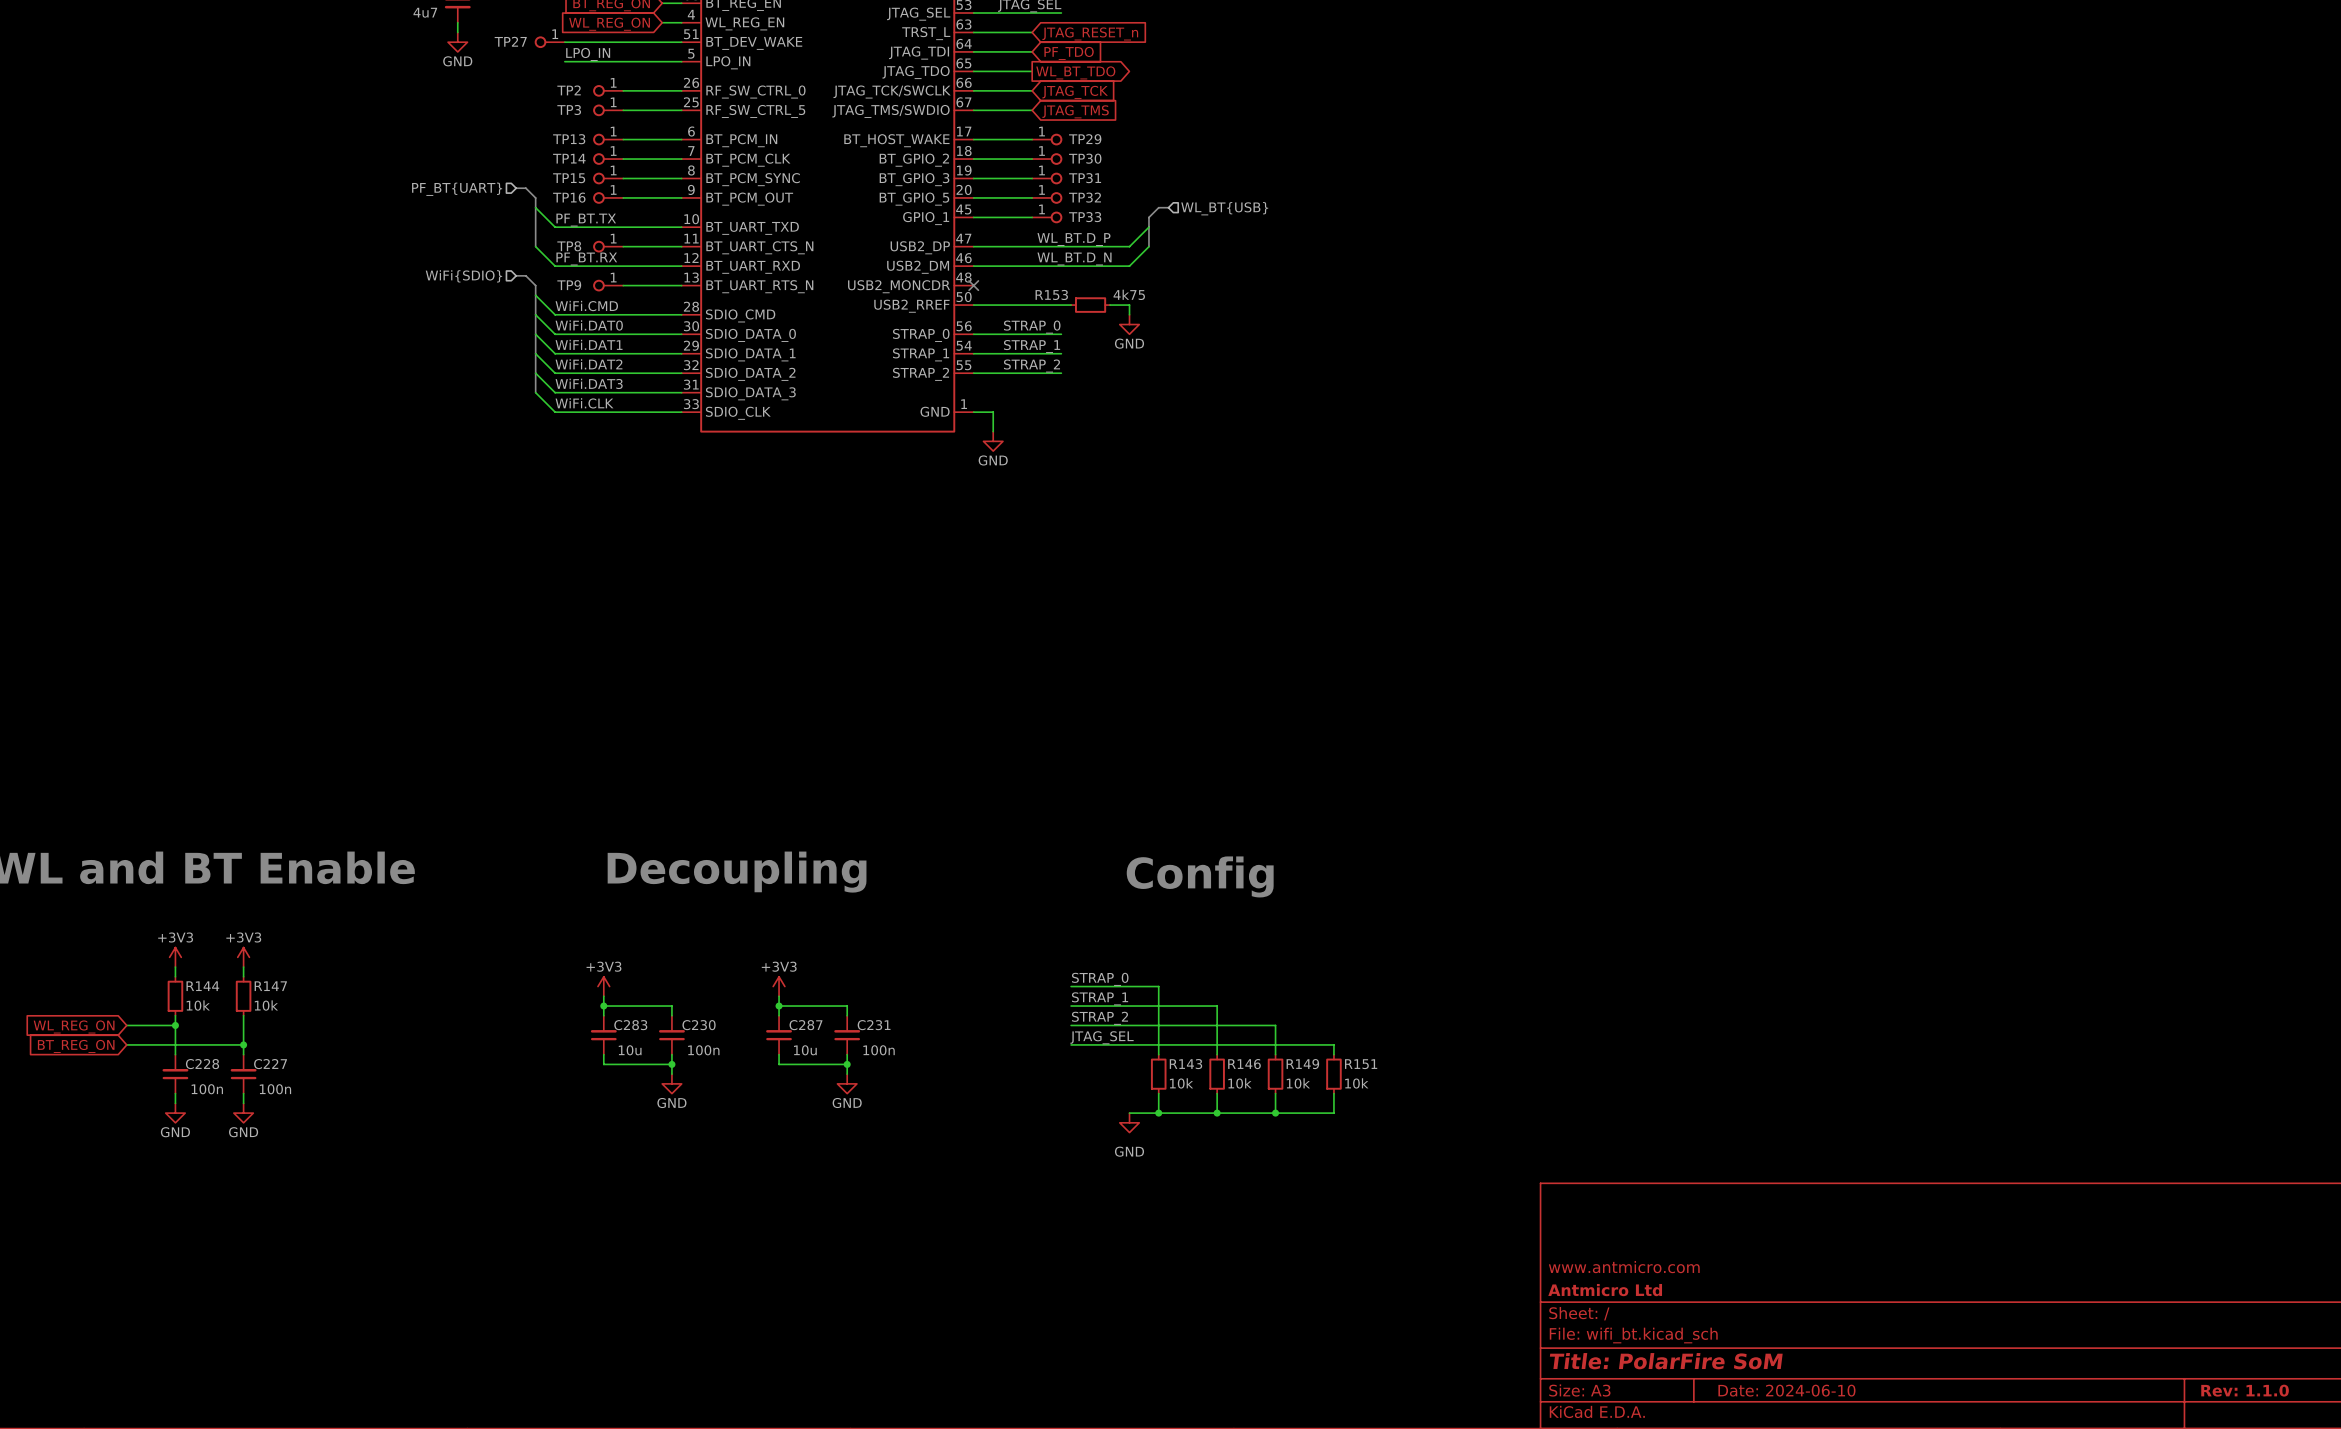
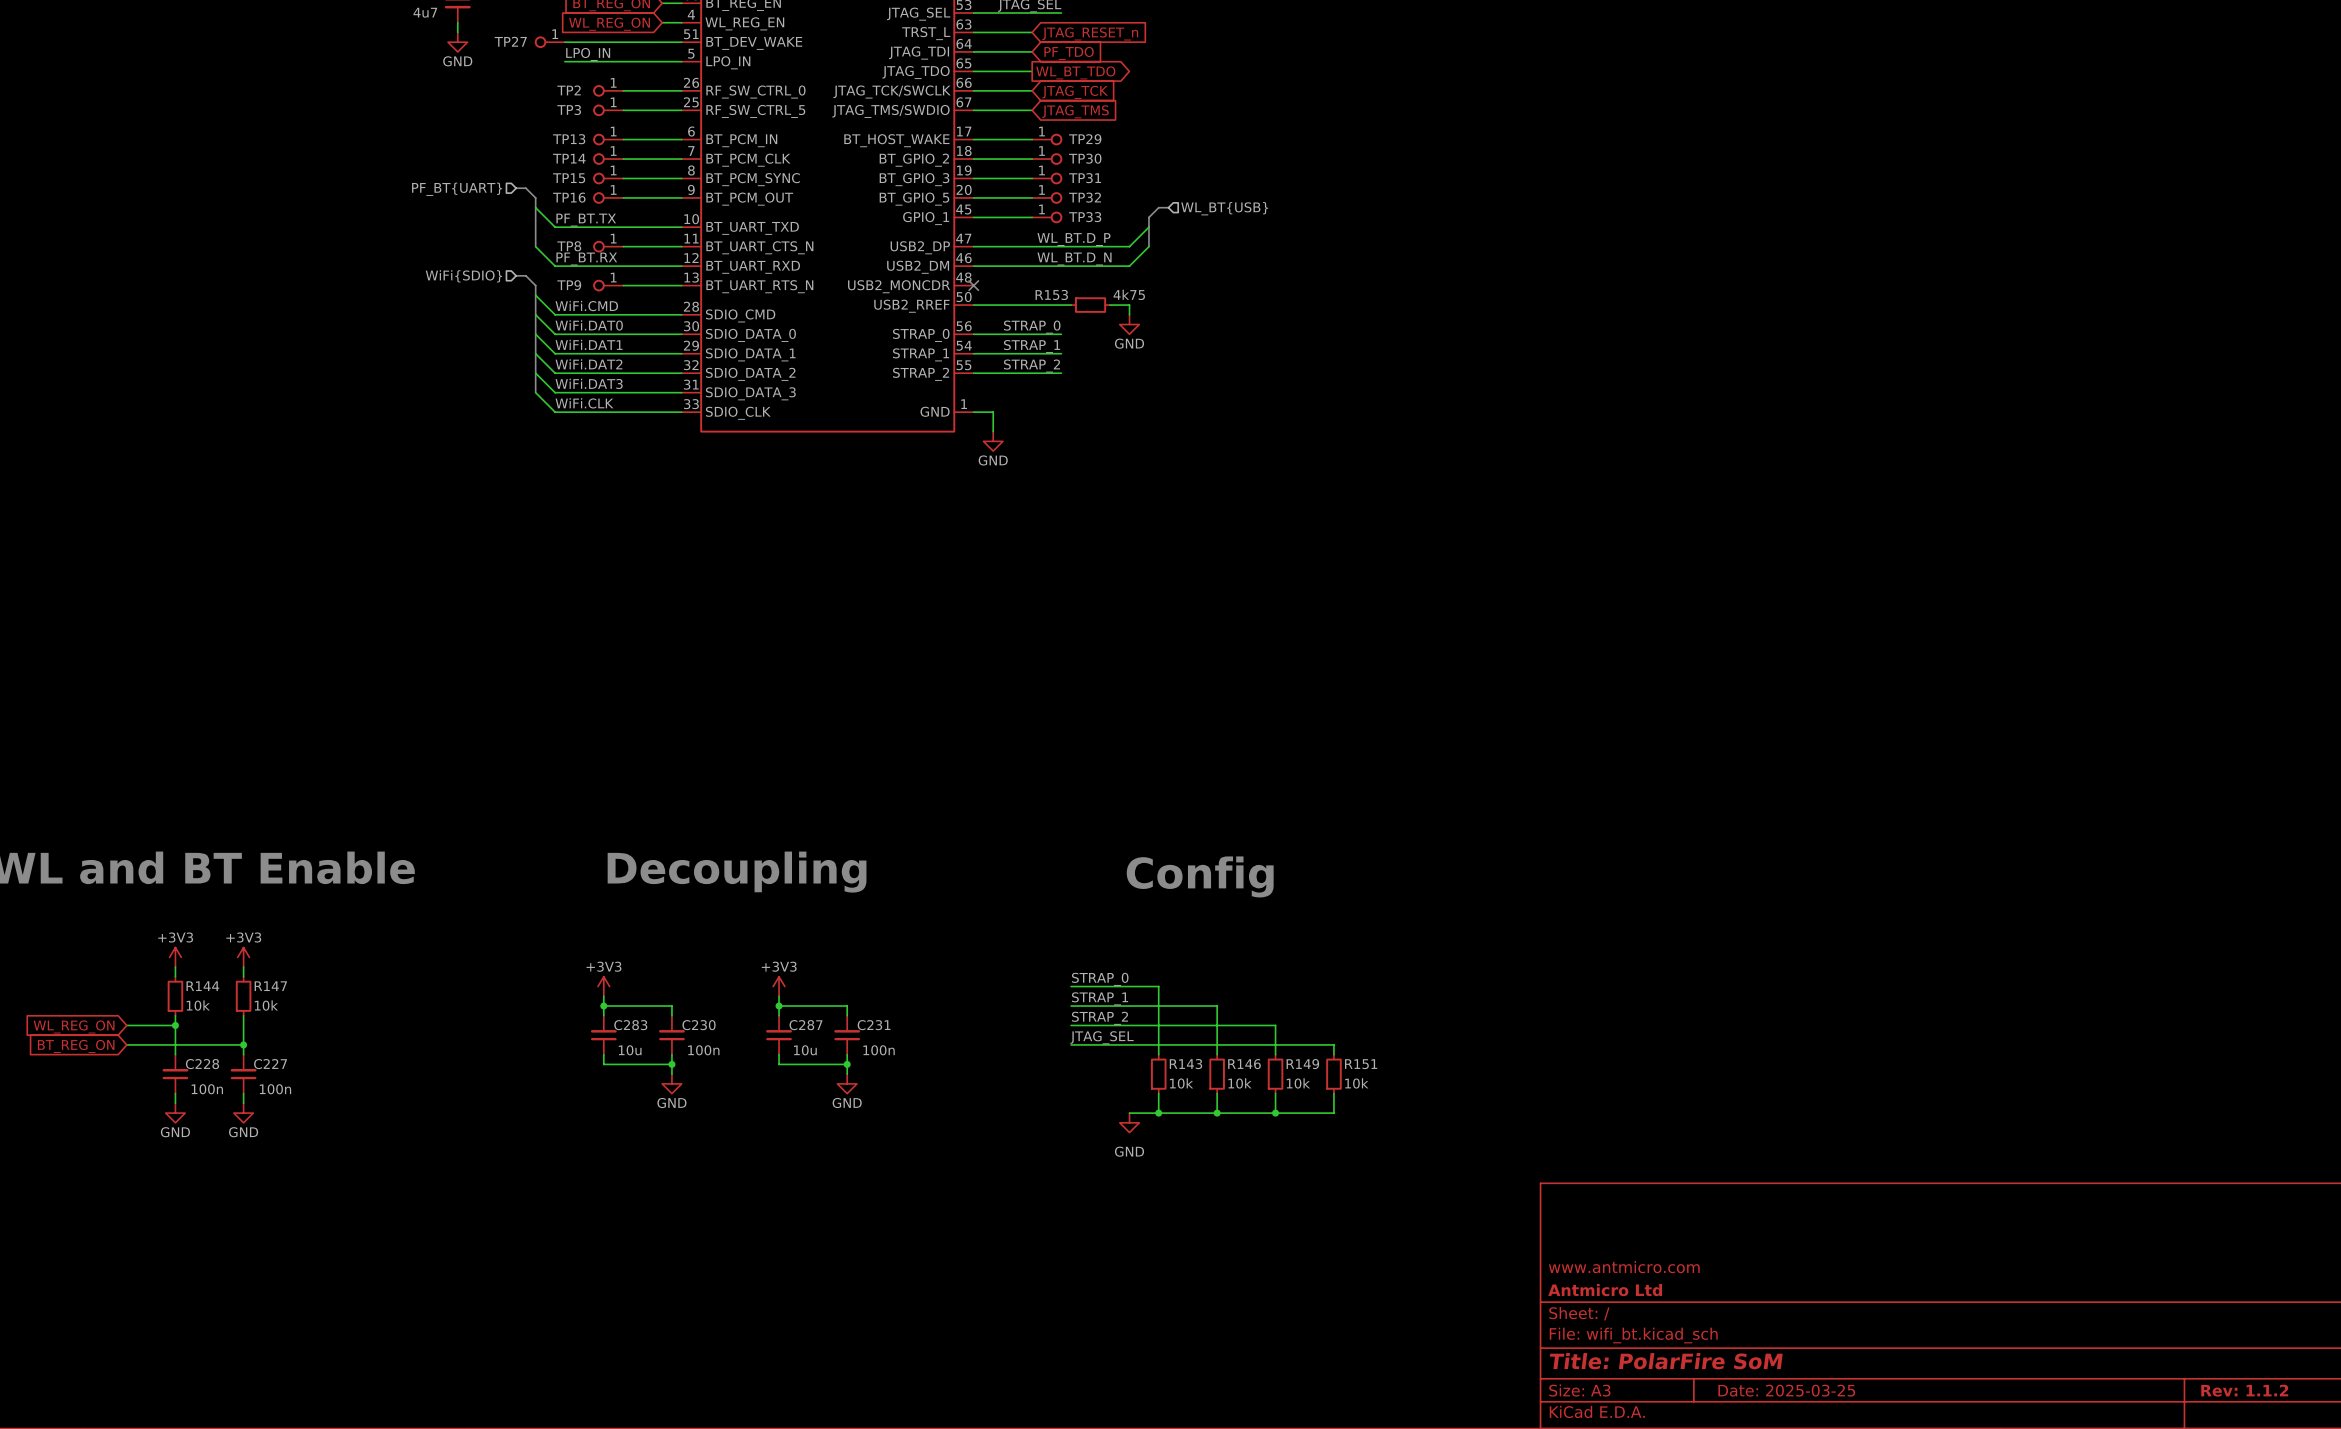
title block: Date: 2024-06-10 (1786, 1390) -> Date: 2025-03-25 (1786, 1390)
title block: Rev: 1.1.0 (2245, 1390) -> Rev: 1.1.2 (2244, 1390)

